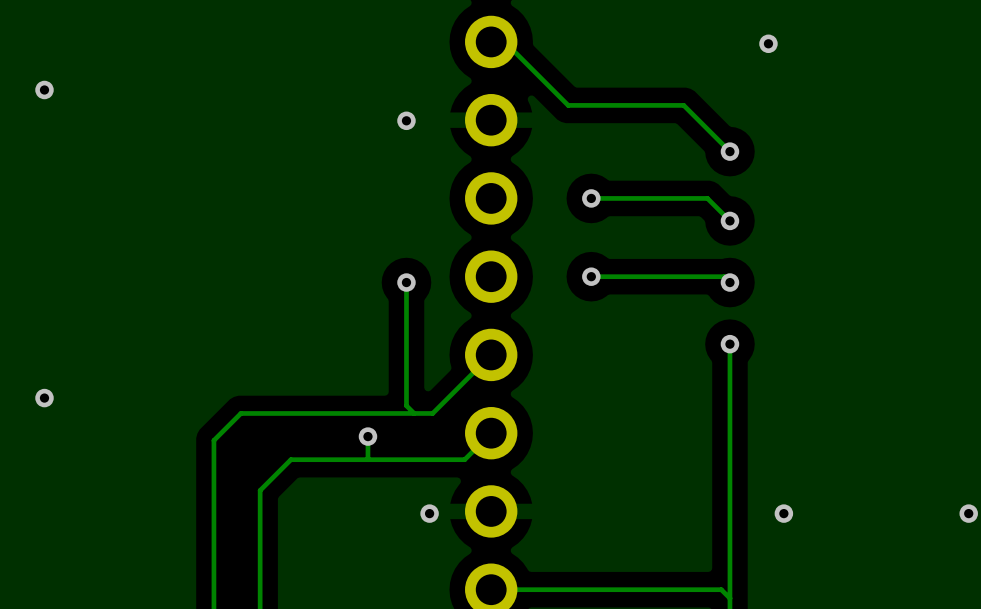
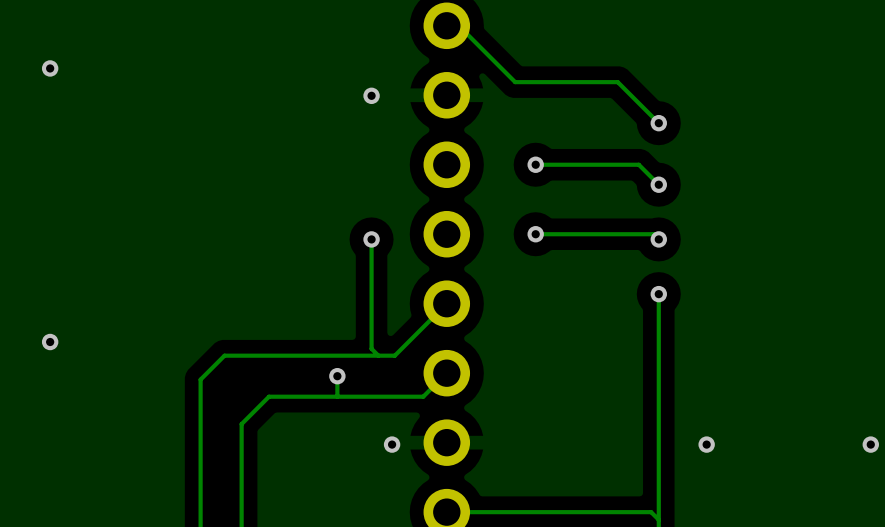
via: (768, 43) -> none

